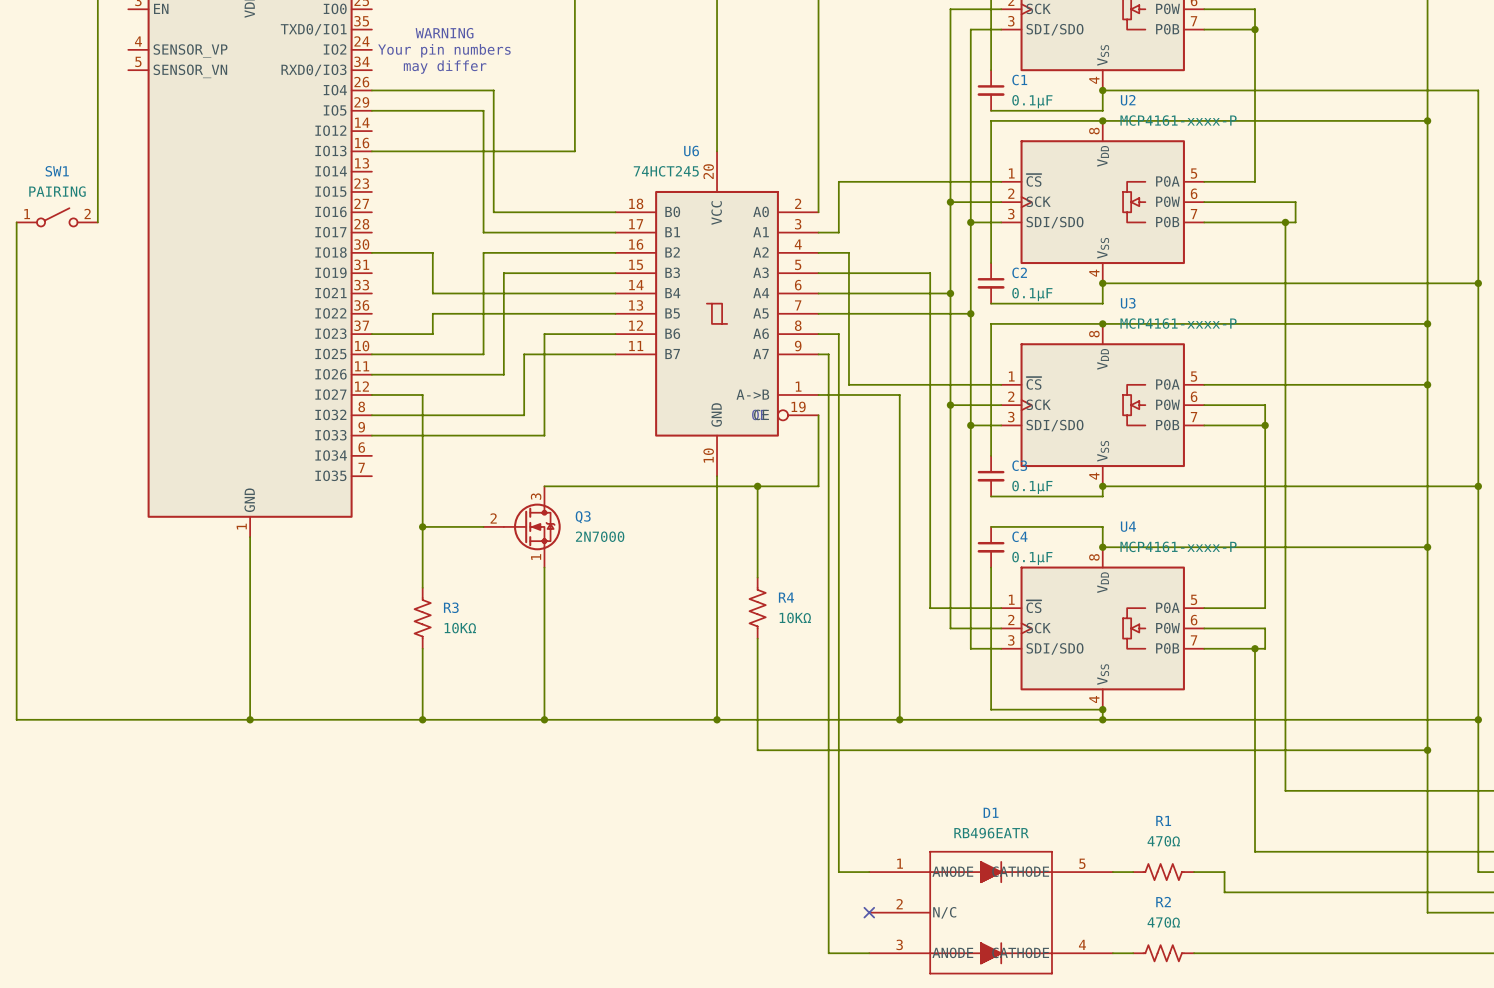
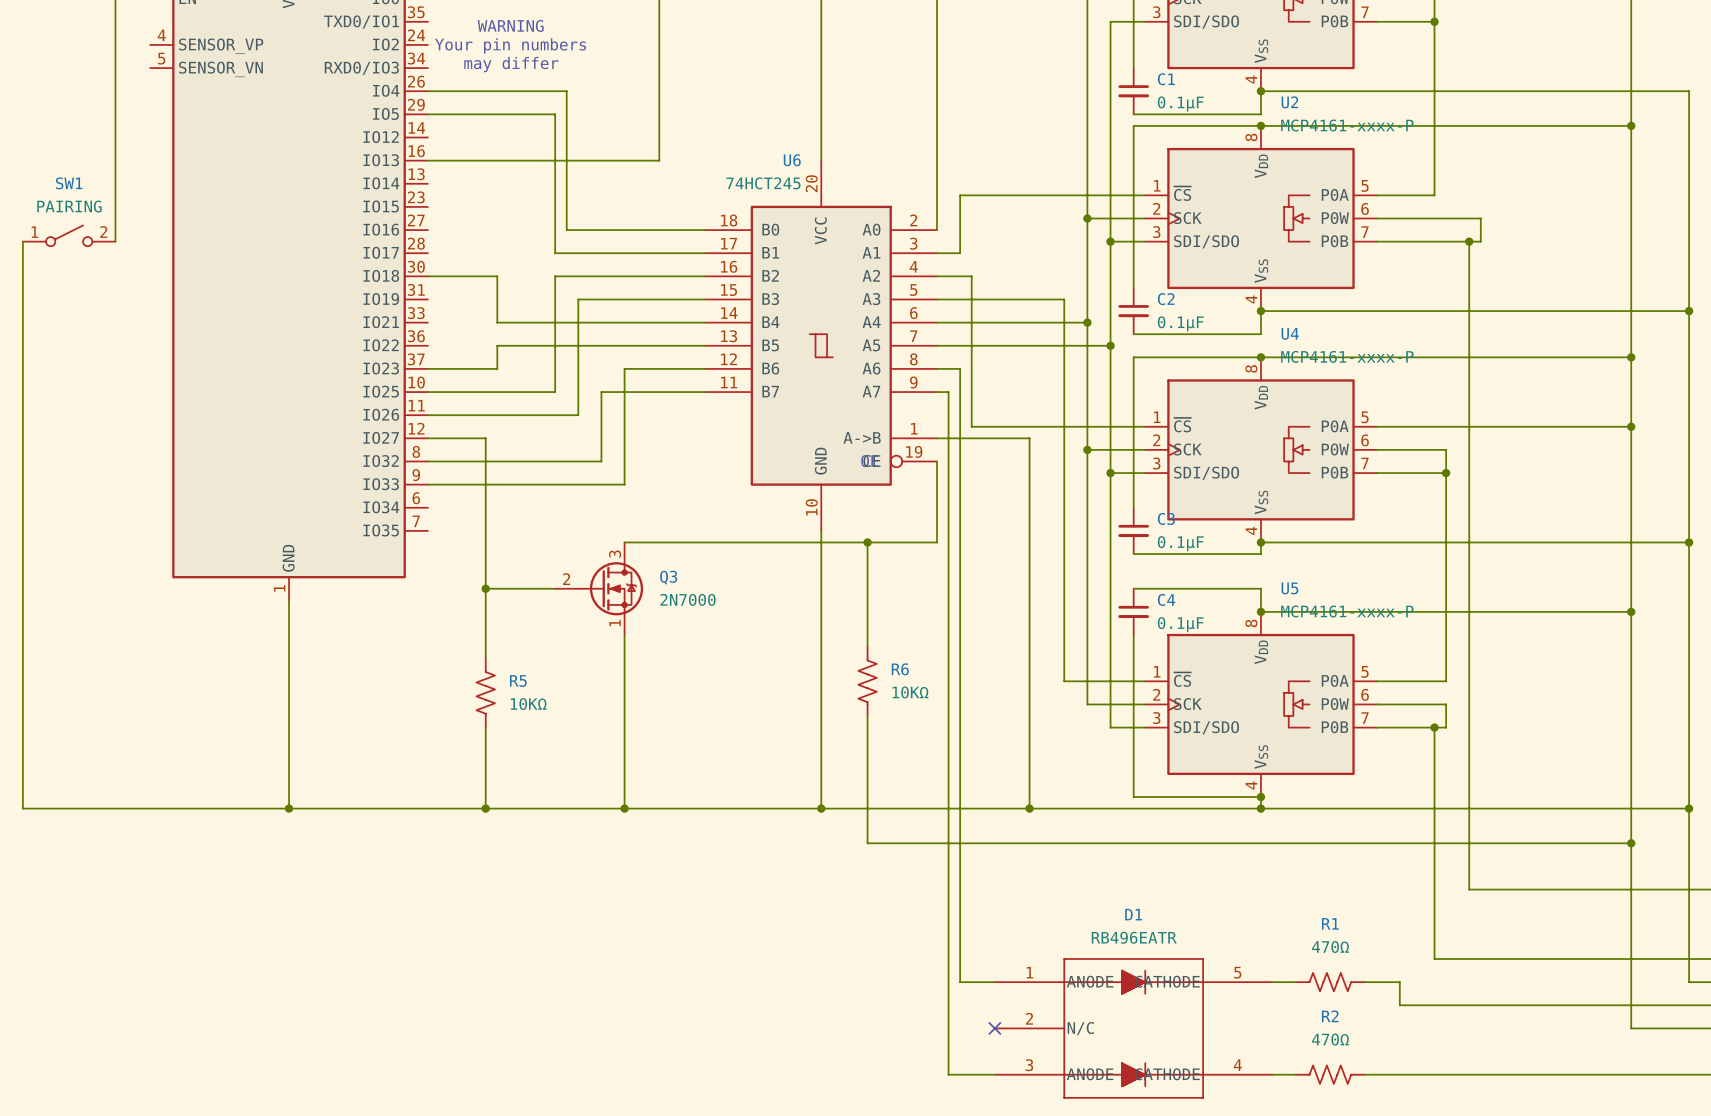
U3 name: U3 (1128, 303) -> U4 (1290, 333)
U4 name: U4 (1128, 526) -> U5 (1289, 588)
R4 name: R4 (786, 597) -> R6 (900, 669)
R3 name: R3 (451, 607) -> R5 (518, 681)

